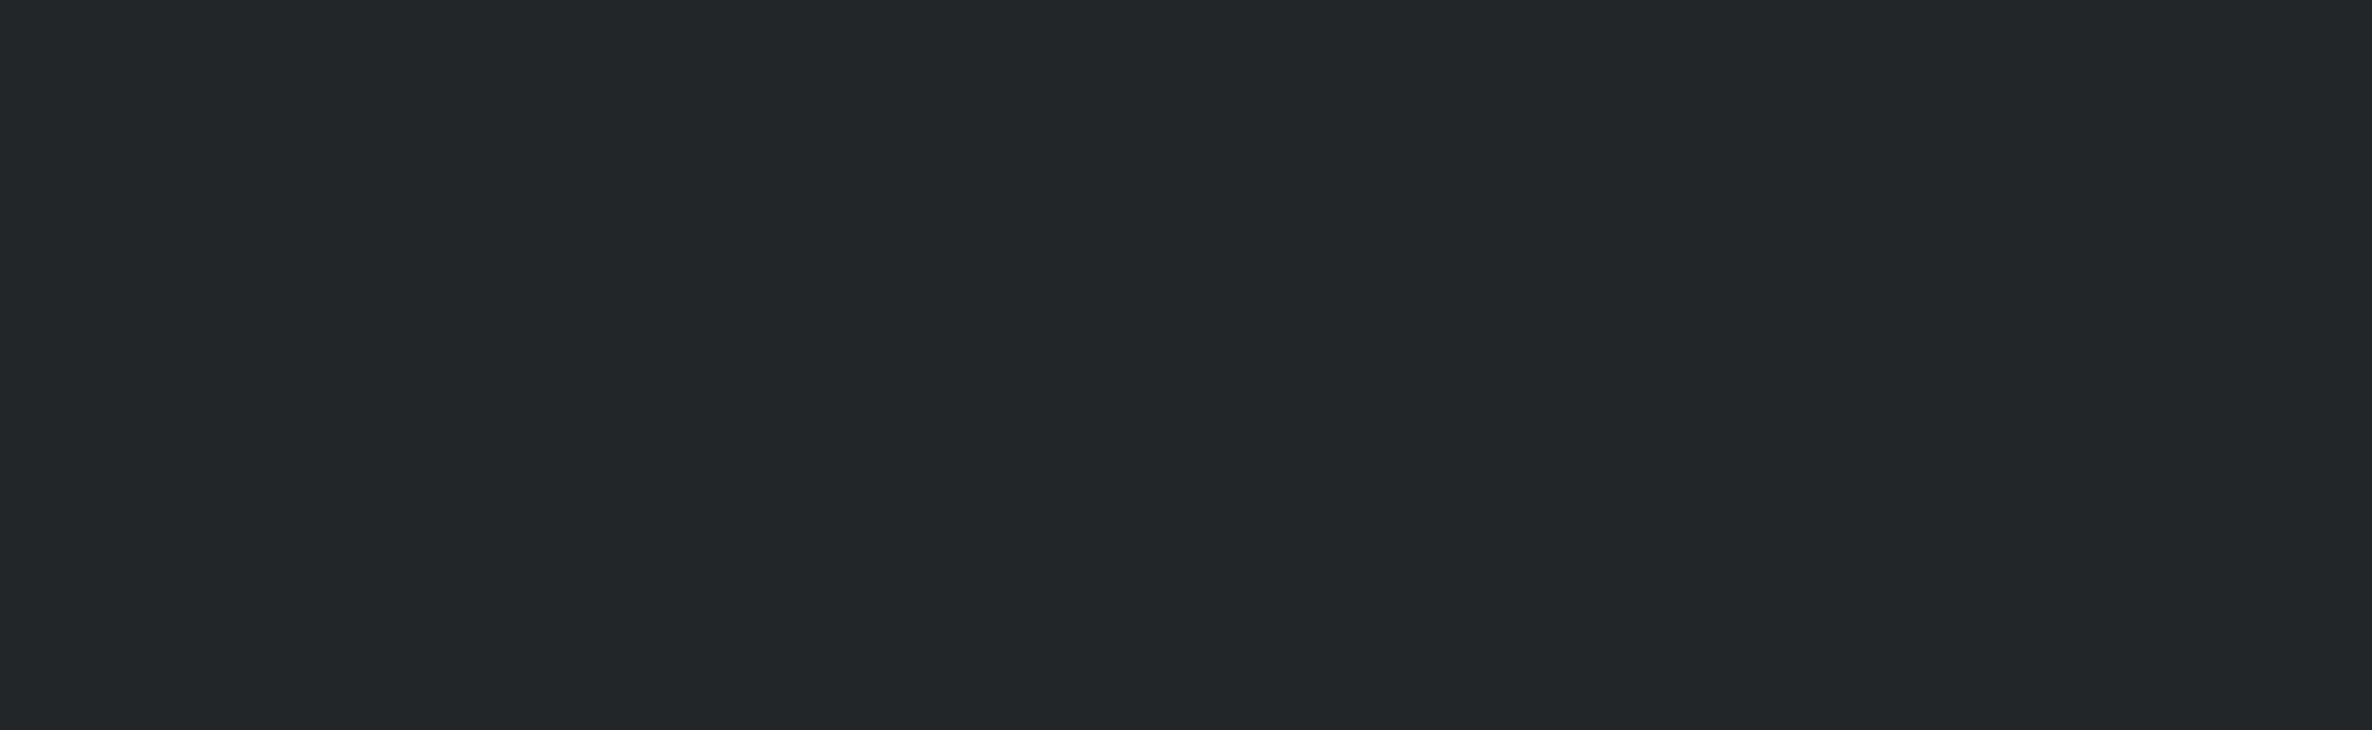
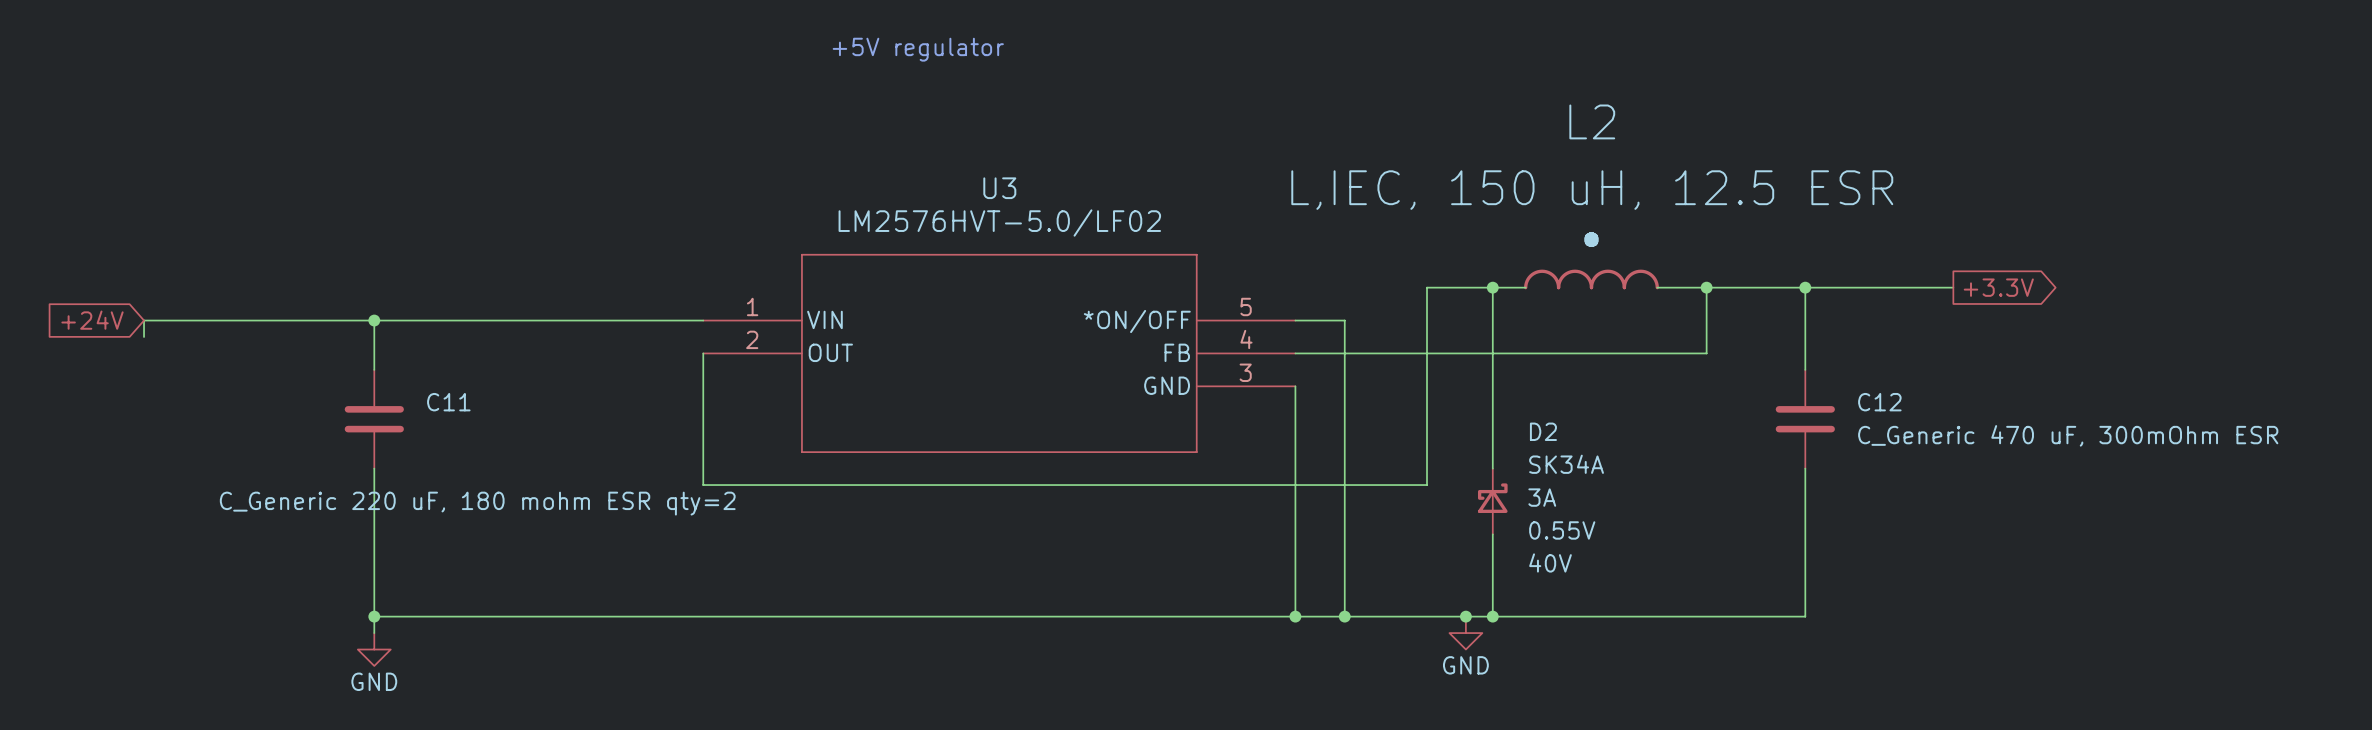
text: none -> +5V regulator (918, 49)
L2: none -> L,IEC, 150 uH, 12.5 ESR (1591, 279)
wire: none -> (1492, 287) (1492, 468)
junction: none -> (1492, 287)
wire: none -> (1525, 287) (1427, 287) (1427, 485) (703, 485) (703, 353)
wire: none -> (1657, 287) (1953, 287)
wire: none -> (1706, 287) (1706, 353) (1295, 353)
junction: none -> (1706, 287)
wire: none -> (1805, 287) (1805, 369)
junction: none -> (1805, 287)
global label: none -> +3.3V (1998, 287)
global label: none -> +24V (92, 320)
wire: none -> (374, 320) (374, 369)
junction: none -> (374, 320)
wire: none -> (703, 320) (144, 320) (144, 336)
wire: none -> (1295, 320) (1344, 320) (1344, 616)
U3: none -> LM2576HVT-5.0/LF02 (999, 353)
wire: none -> (1295, 386) (1295, 616)
C11: none -> C_Generic 220 uF, 180 mohm ESR qty=2 (374, 419)
C12: none -> C_Generic 470 uF, 300mOhm ESR (1805, 419)
wire: none -> (374, 468) (374, 633)
wire: none -> (1805, 468) (1805, 616) (374, 616)
D2: none -> SK34A (1492, 501)
wire: none -> (1492, 534) (1492, 616)
junction: none -> (374, 616)
junction: none -> (1295, 616)
junction: none -> (1344, 616)
junction: none -> (1465, 616)
junction: none -> (1492, 616)
power symbol: none -> GND (1465, 633)
power symbol: none -> GND (374, 649)

